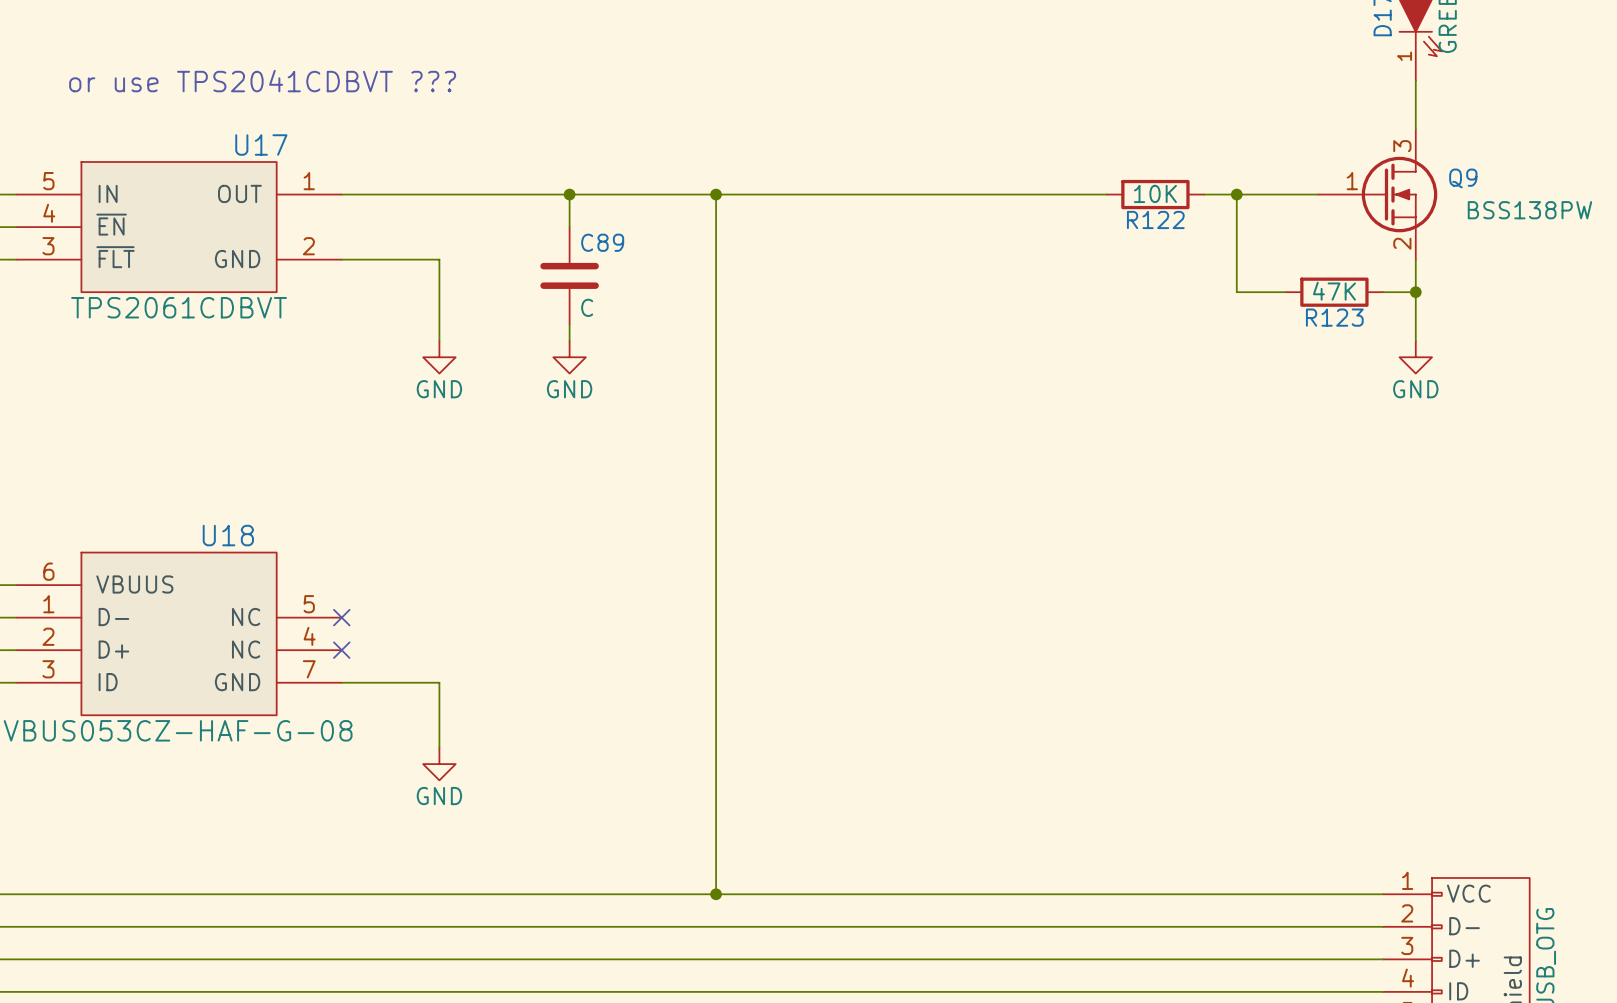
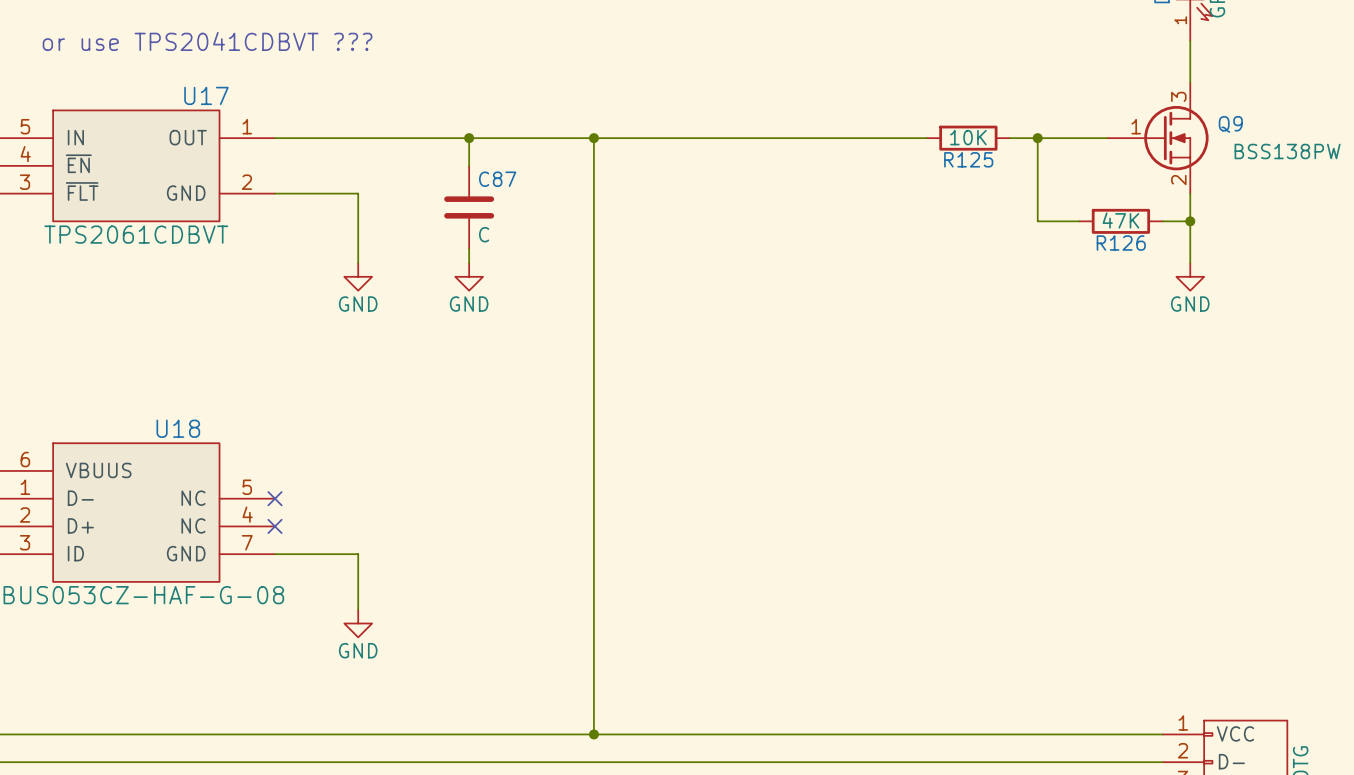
R122 name: R122 (1155, 219) -> R125 (968, 159)
C89 name: C89 (602, 242) -> C87 (497, 179)
R123 name: R123 (1334, 317) -> R126 (1121, 243)

